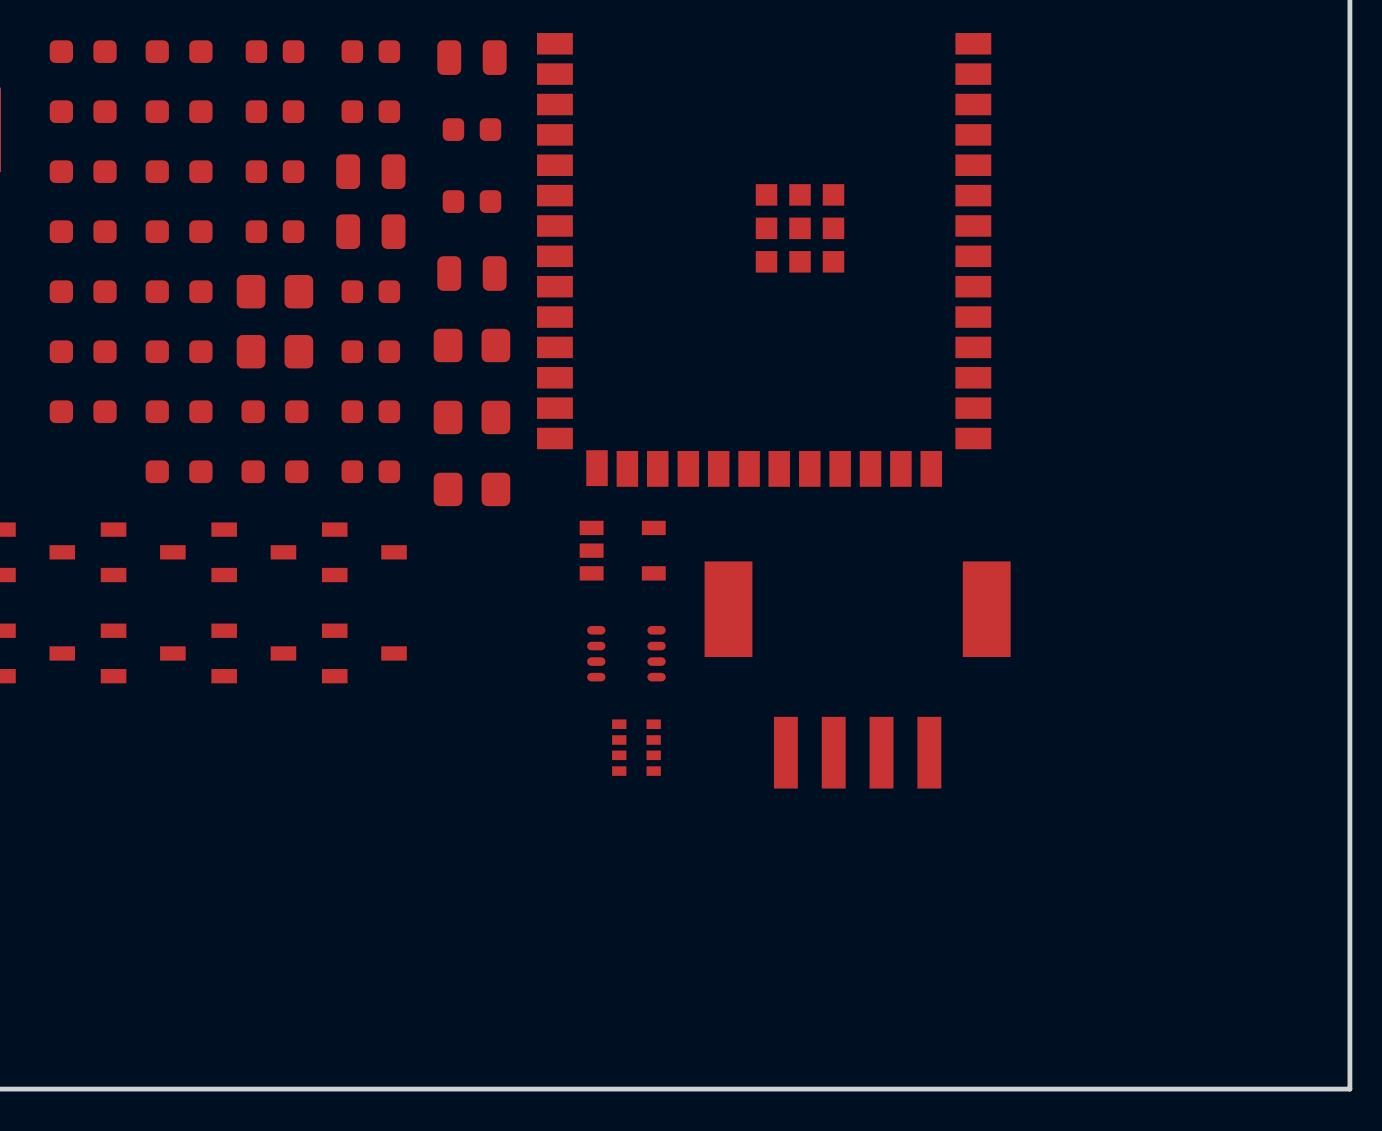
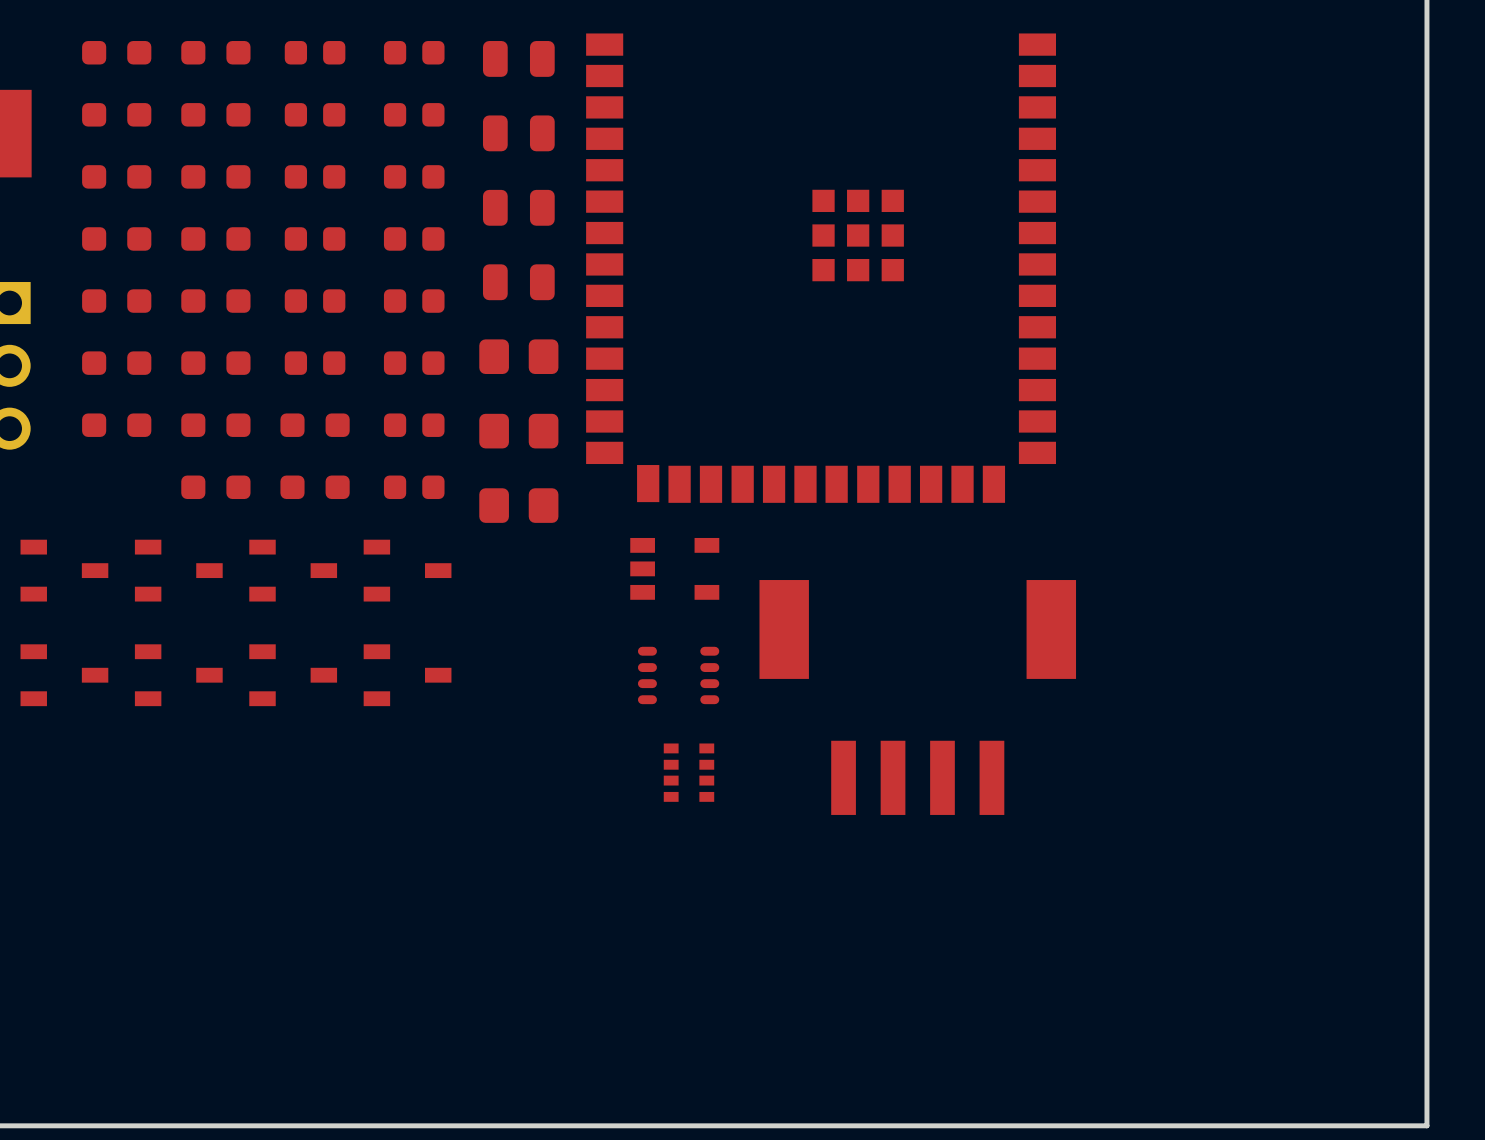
part footprint: [442, 118, 502, 141] -> [482, 115, 555, 152]
part footprint: [336, 154, 406, 190] -> [383, 165, 445, 189]
part footprint: [442, 190, 502, 213] -> [482, 189, 555, 226]
part footprint: [336, 214, 406, 250] -> [383, 227, 445, 251]
part footprint: [236, 274, 314, 309] -> [284, 289, 346, 313]
part footprint: [236, 334, 314, 369] -> [284, 351, 346, 375]

